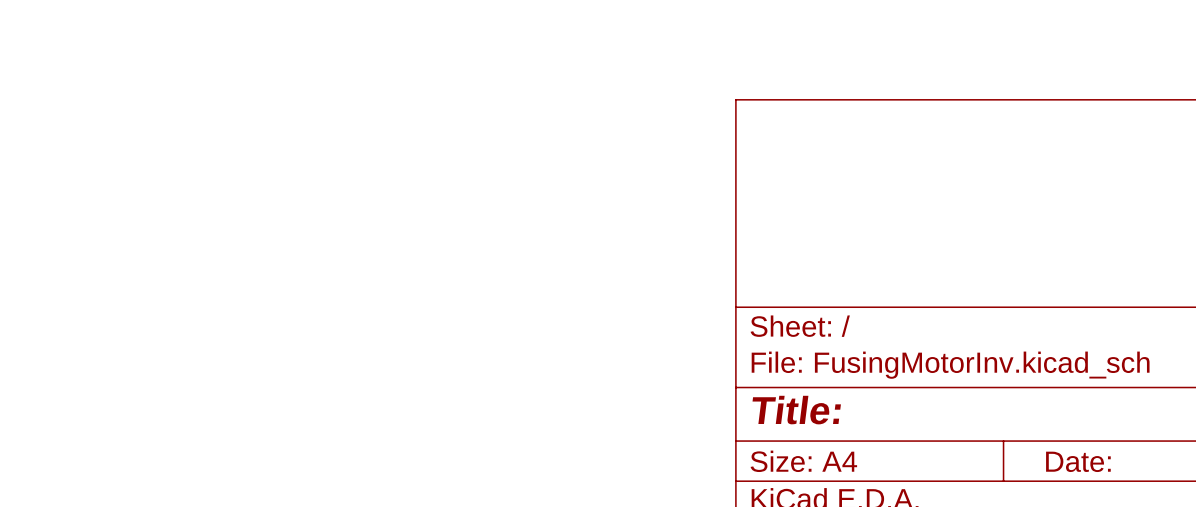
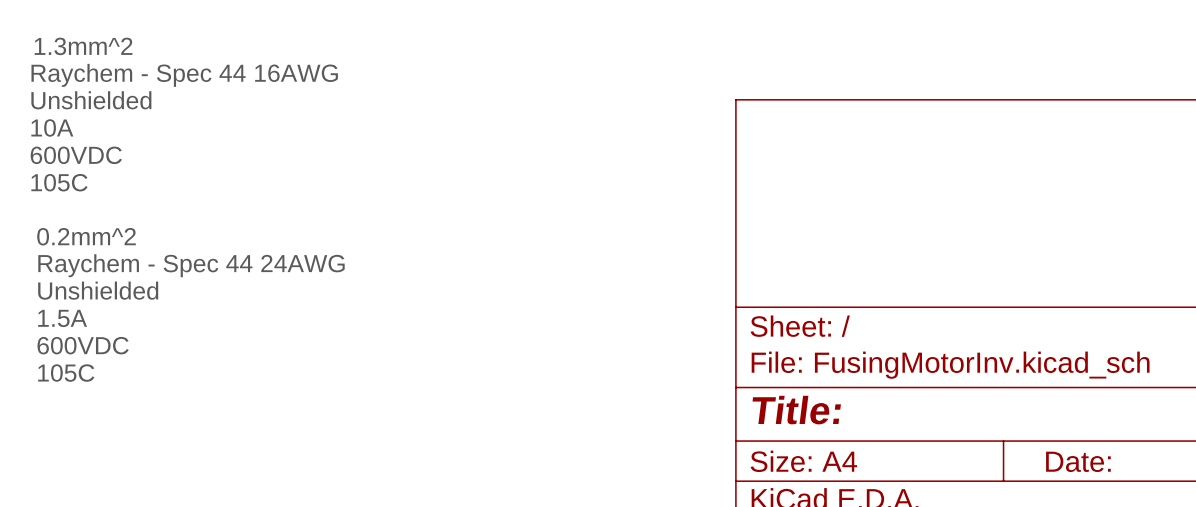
text: none -> 1.3mm^2 (83, 46)
text: none -> Raychem - Spec 44 16AWG (184, 75)
text: none -> Unshielded (91, 100)
text: none -> 10A (52, 127)
text: none -> 600VDC (76, 155)
text: none -> 105C (59, 182)
text: none -> 0.2mm^2 (86, 236)
text: none -> Raychem - Spec 44 24AWG (191, 265)
text: none -> Unshielded (98, 290)
text: none -> 1.5A (62, 318)
text: none -> 600VDC (83, 345)
text: none -> 105C (66, 373)

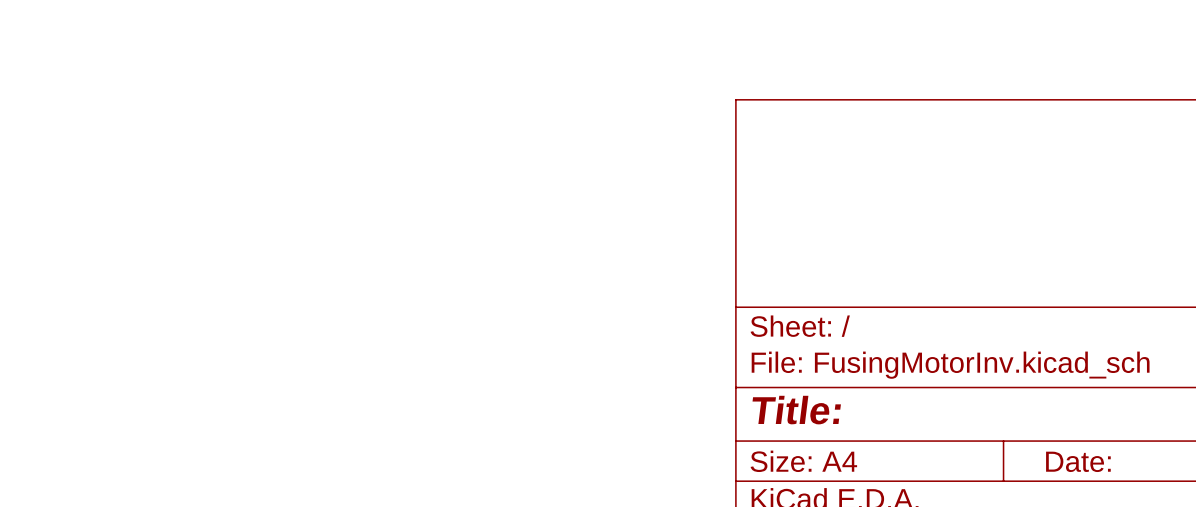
text: 1.3mm^2 (83, 46) -> none
text: Raychem - Spec 44 16AWG (184, 75) -> none
text: Unshielded (91, 100) -> none
text: 10A (52, 127) -> none
text: 600VDC (76, 155) -> none
text: 105C (59, 182) -> none
text: 0.2mm^2 (86, 236) -> none
text: Raychem - Spec 44 24AWG (191, 265) -> none
text: Unshielded (98, 290) -> none
text: 1.5A (62, 318) -> none
text: 600VDC (83, 345) -> none
text: 105C (66, 373) -> none

